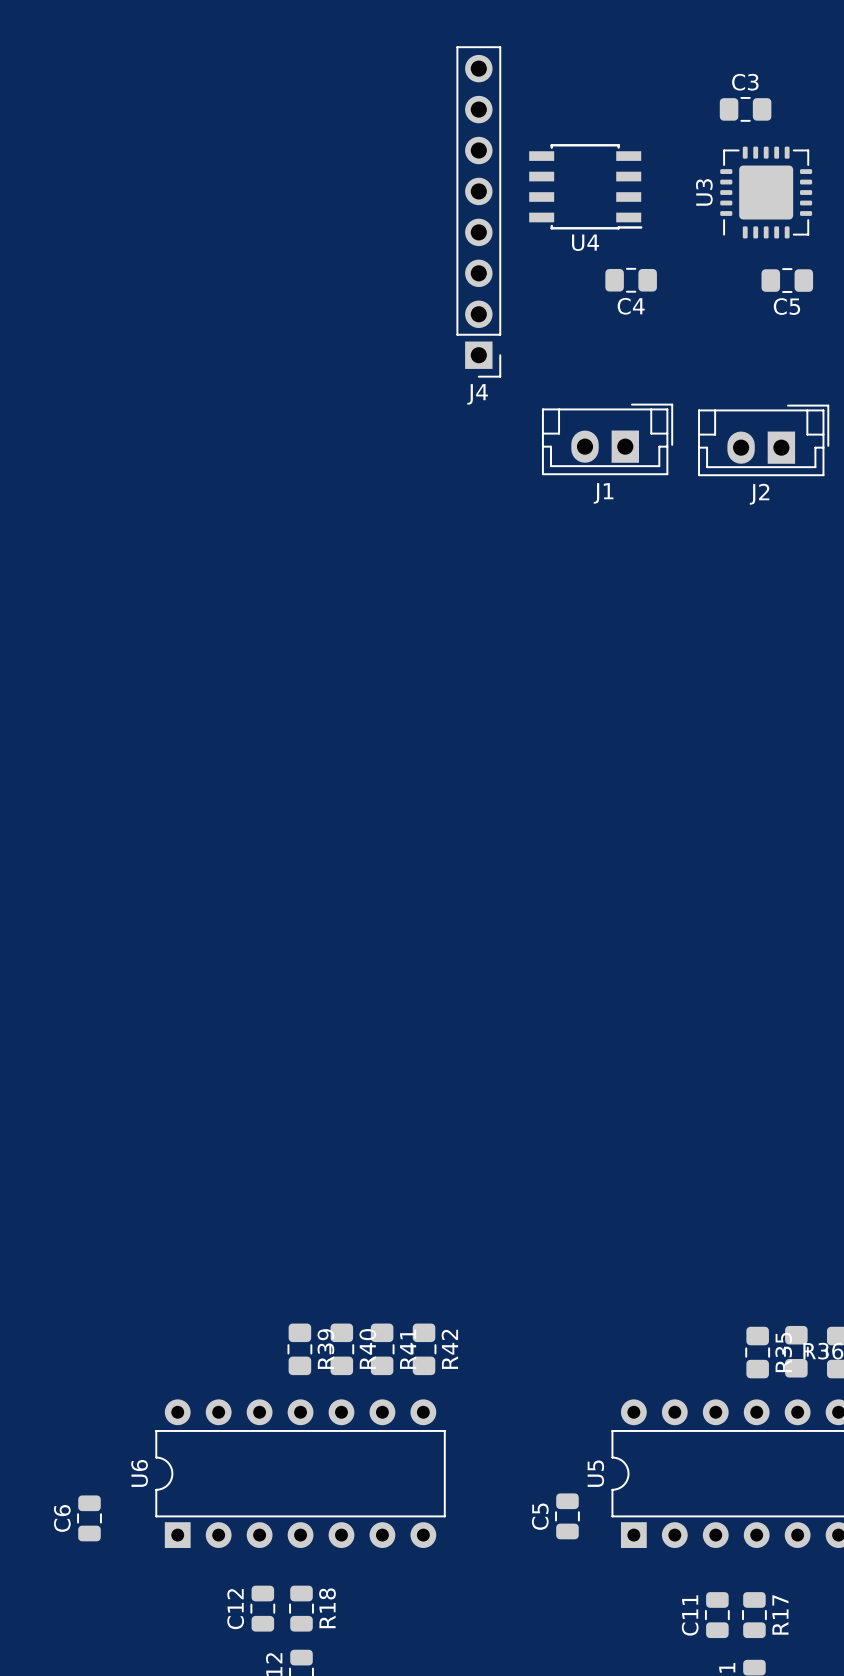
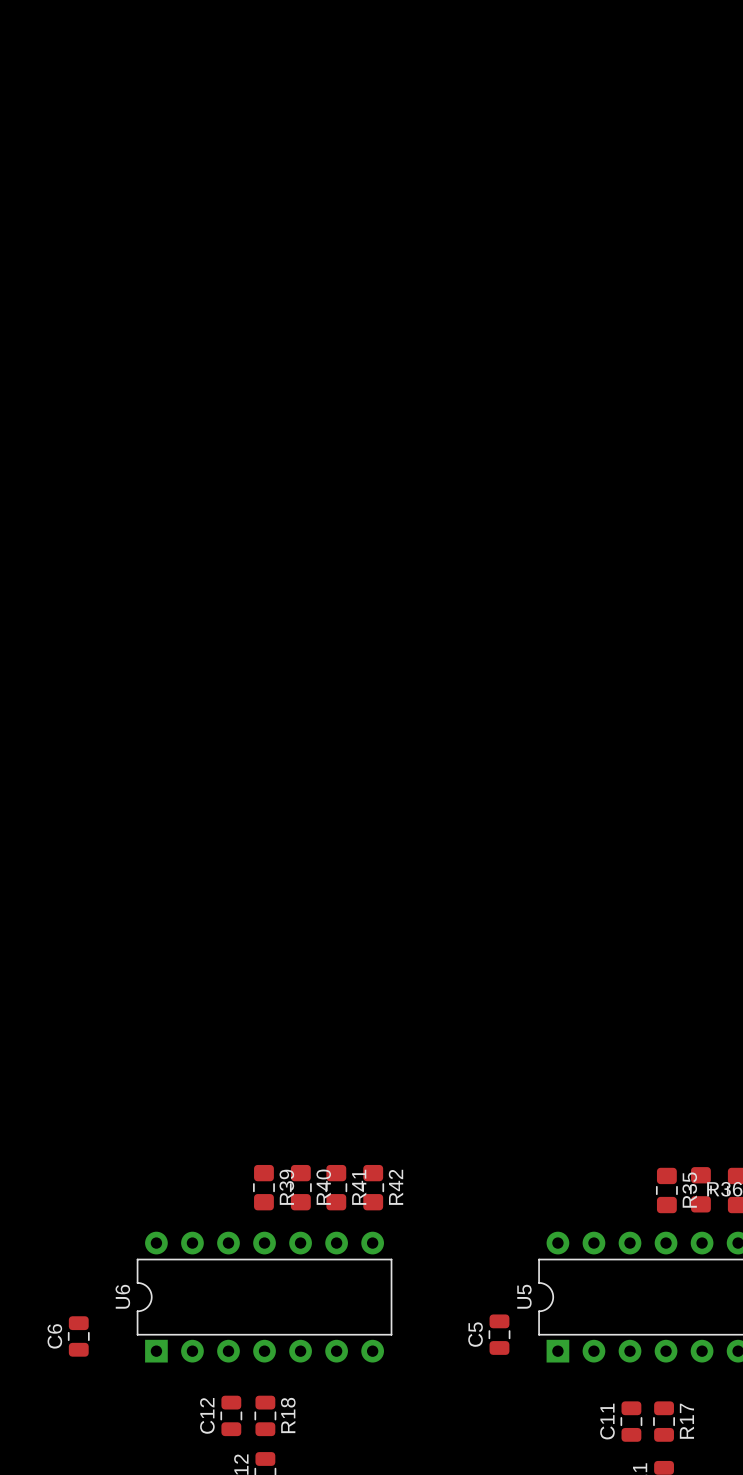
C3: (745, 109) -> none
U4: (585, 186) -> none
U3: (766, 192) -> none
J4: (478, 211) -> none
C4: (631, 280) -> none
C5: (787, 280) -> none
J1: (607, 439) -> none
J2: (763, 440) -> none

